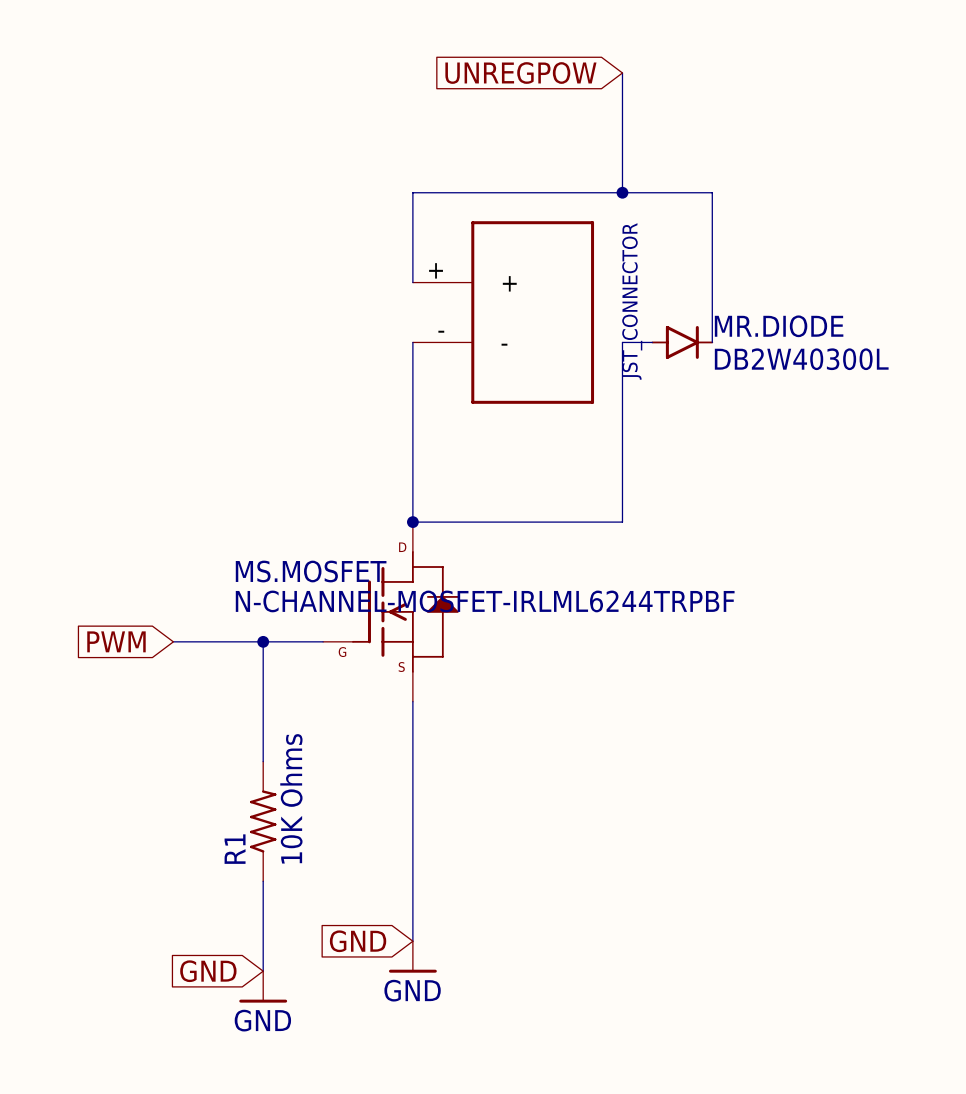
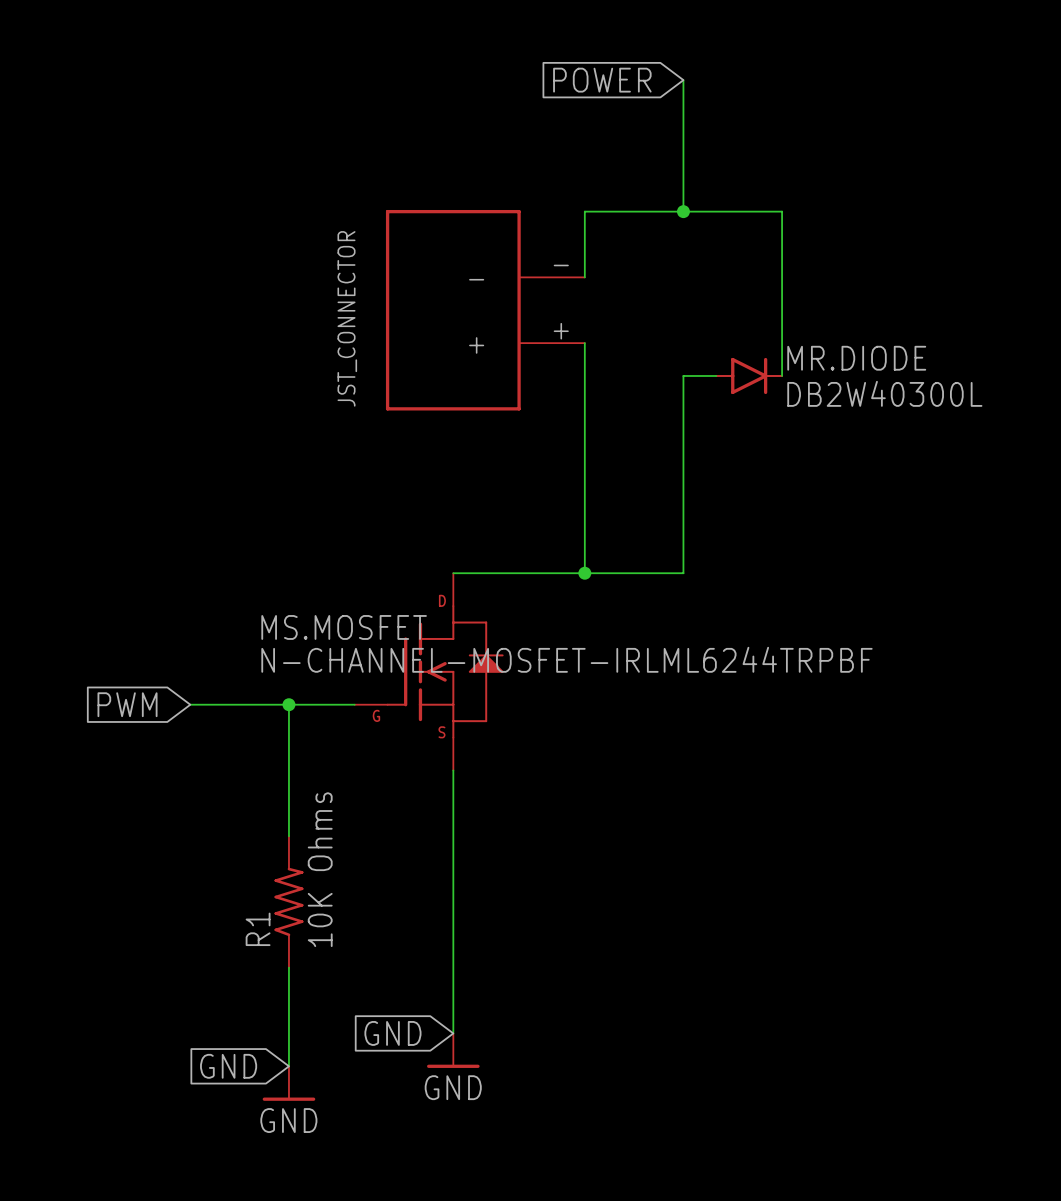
global label: UNREGPOW (520, 73) -> POWER (602, 80)
wire: (532, 192) (412, 192) (412, 282) -> (584, 211) (584, 277)
part: none -> (485, 310)
part: (503, 312) -> none
wire: none -> (584, 343) (584, 573)
wire: (412, 342) (412, 522) -> none
junction: (412, 522) -> none
junction: none -> (584, 573)

